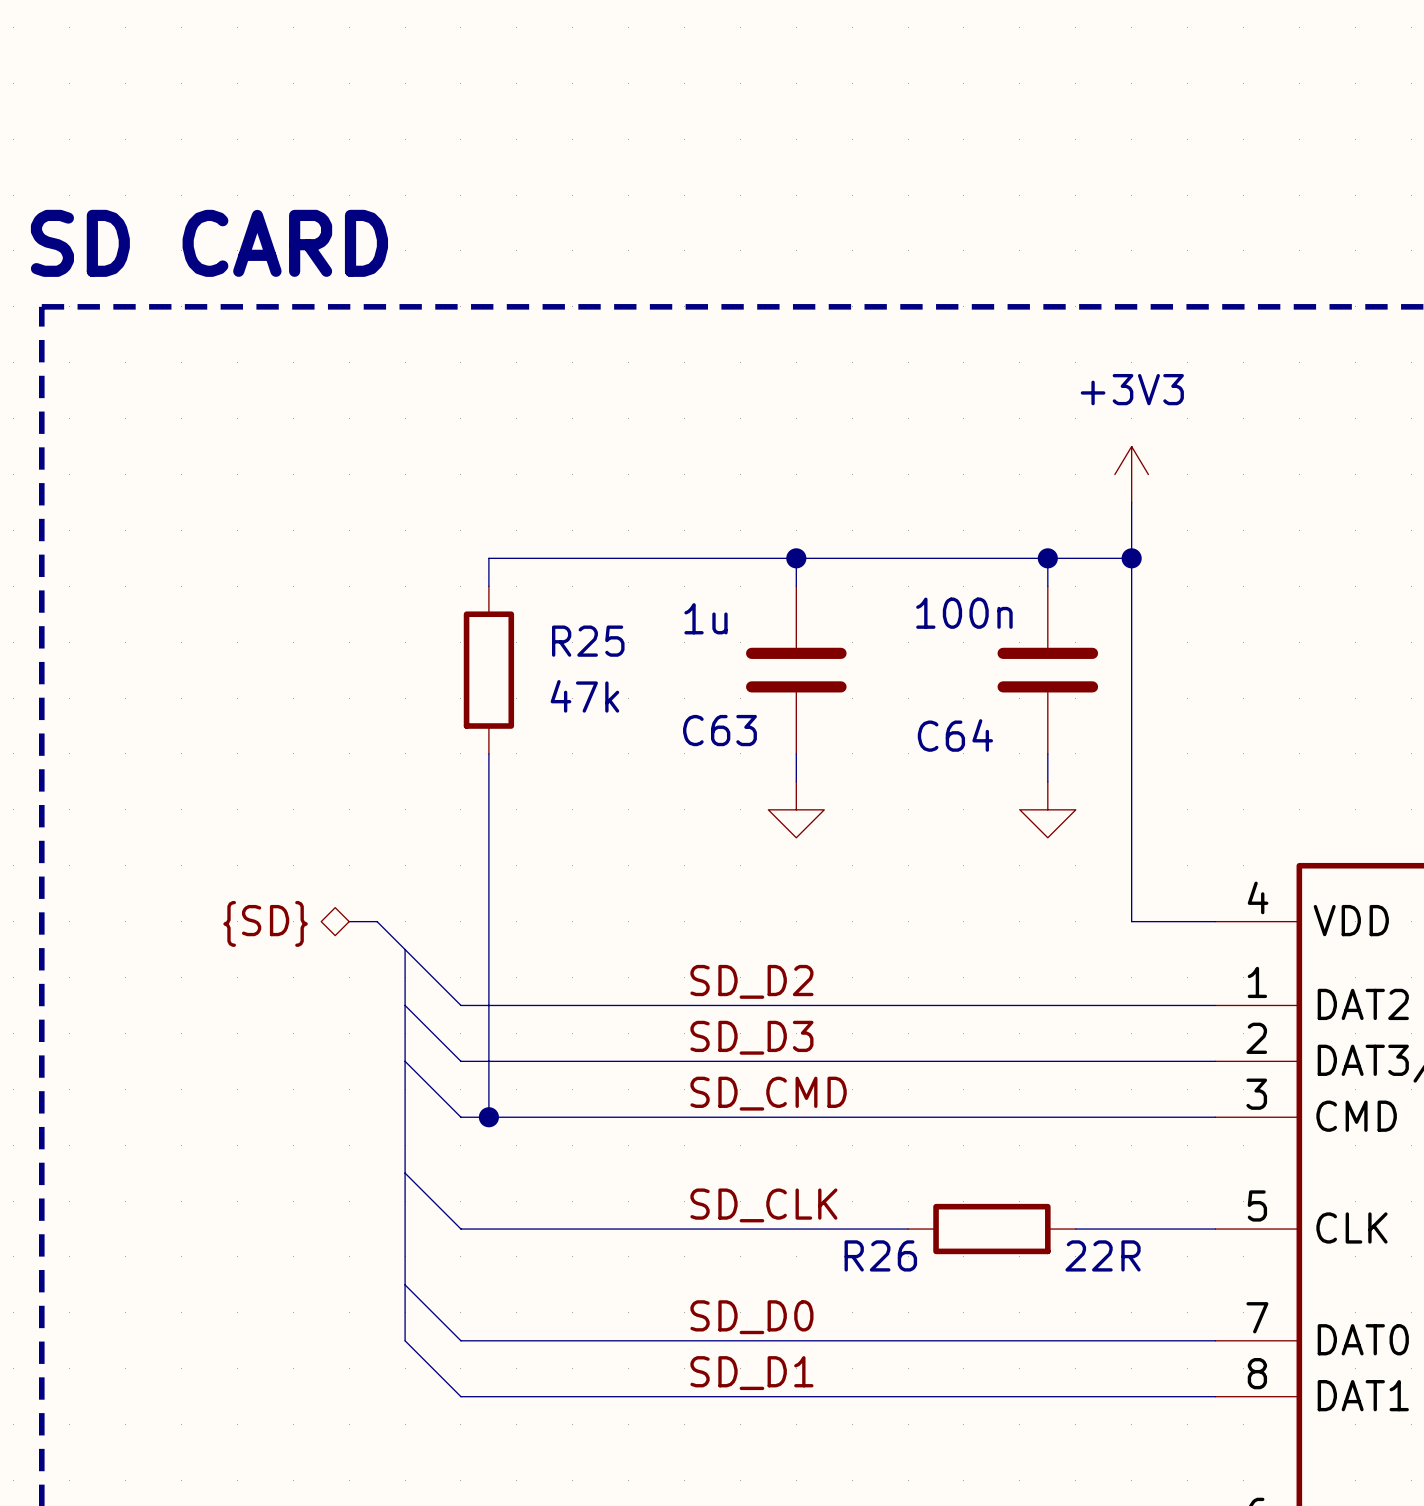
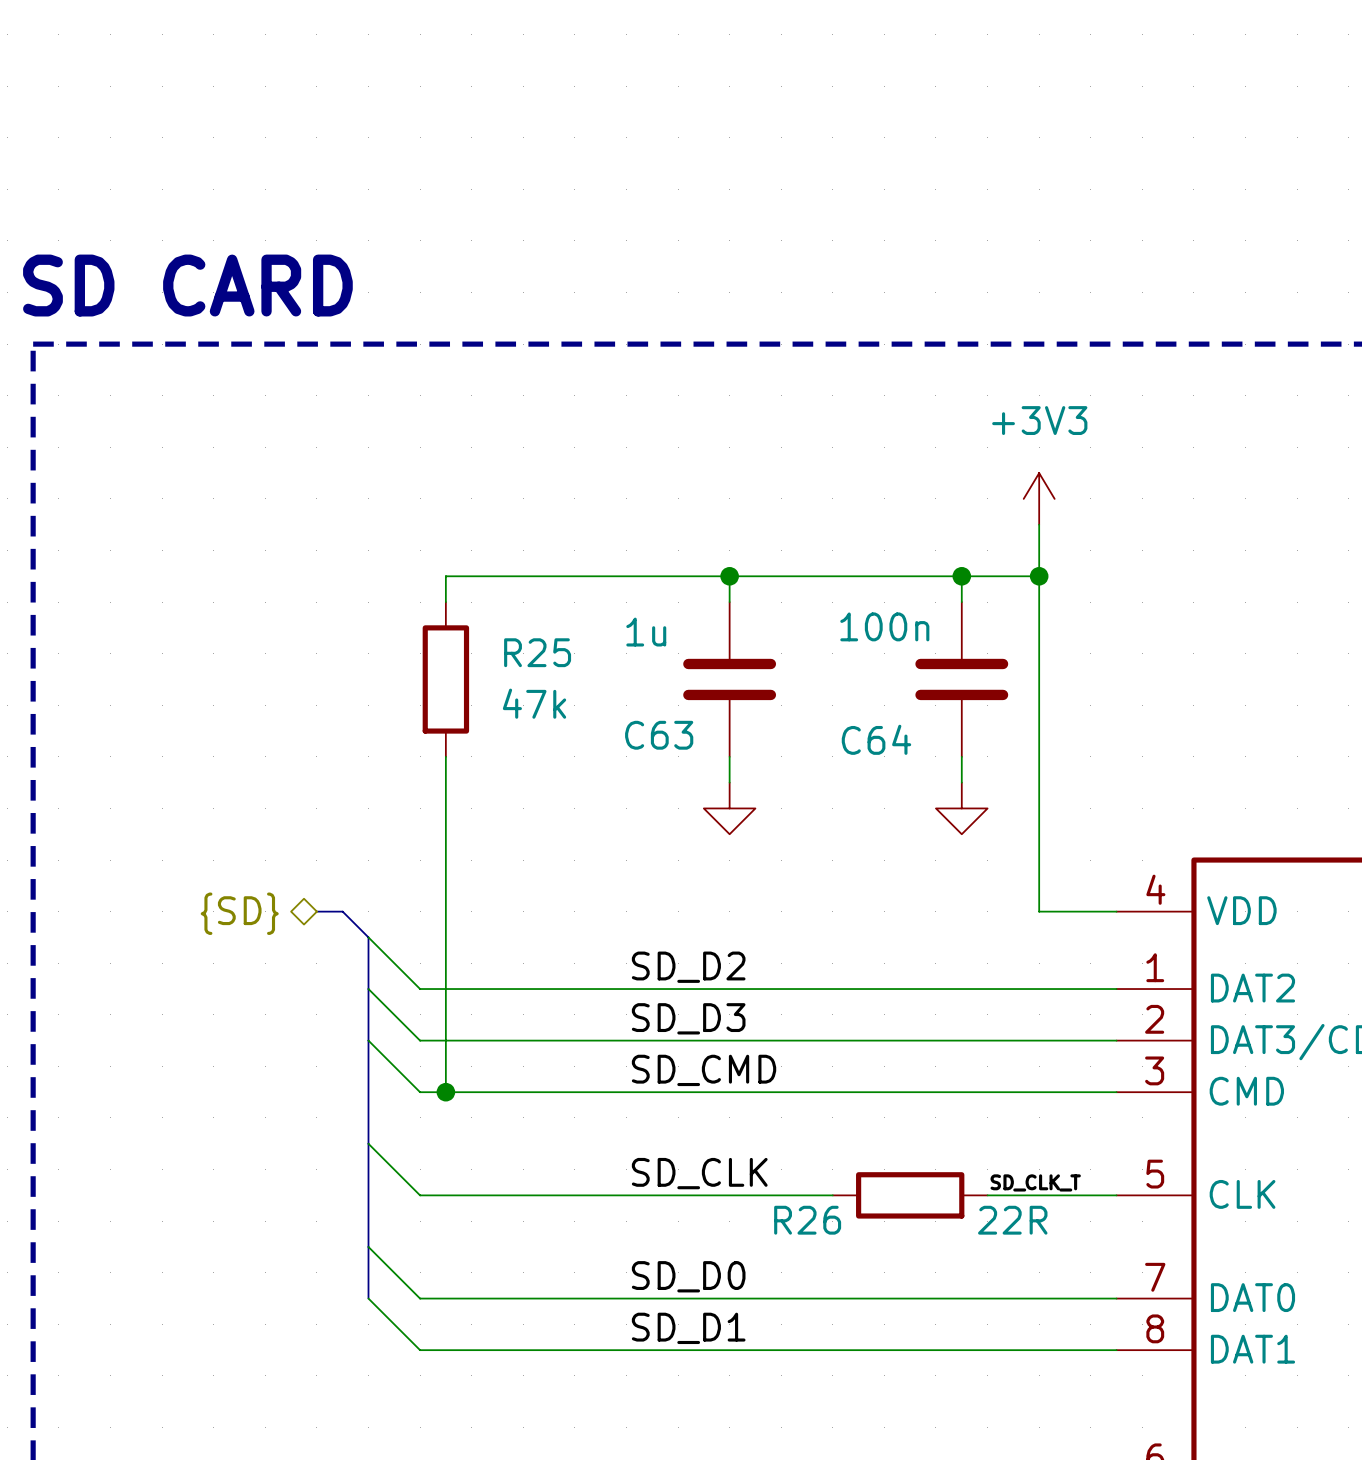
label: none -> SD_CLK_T (1035, 1182)

